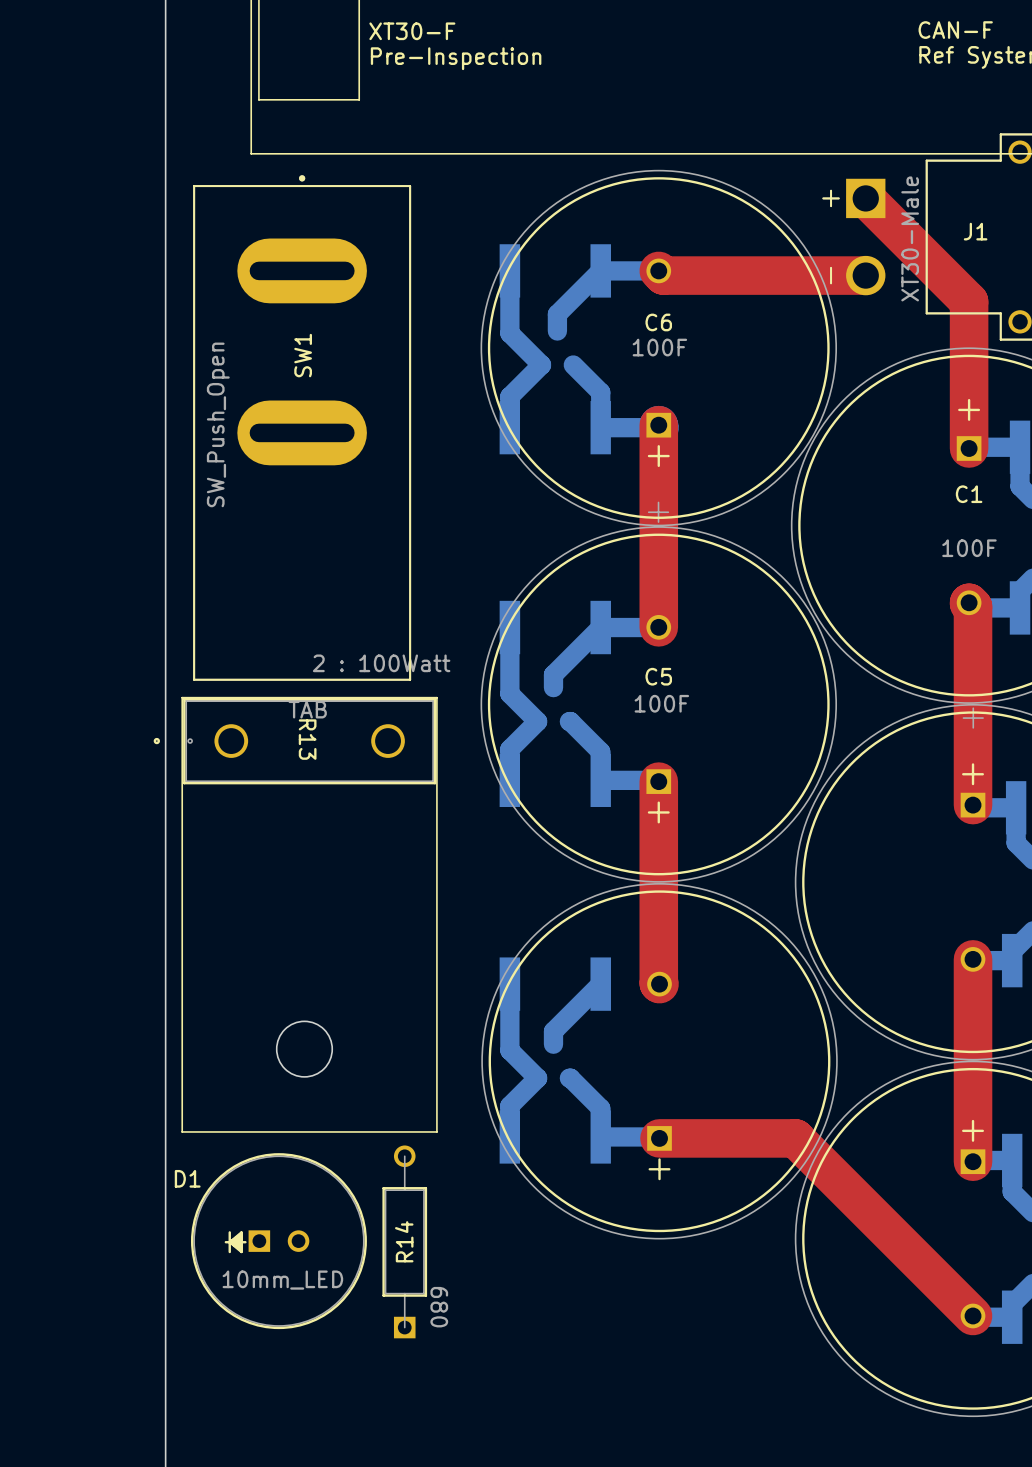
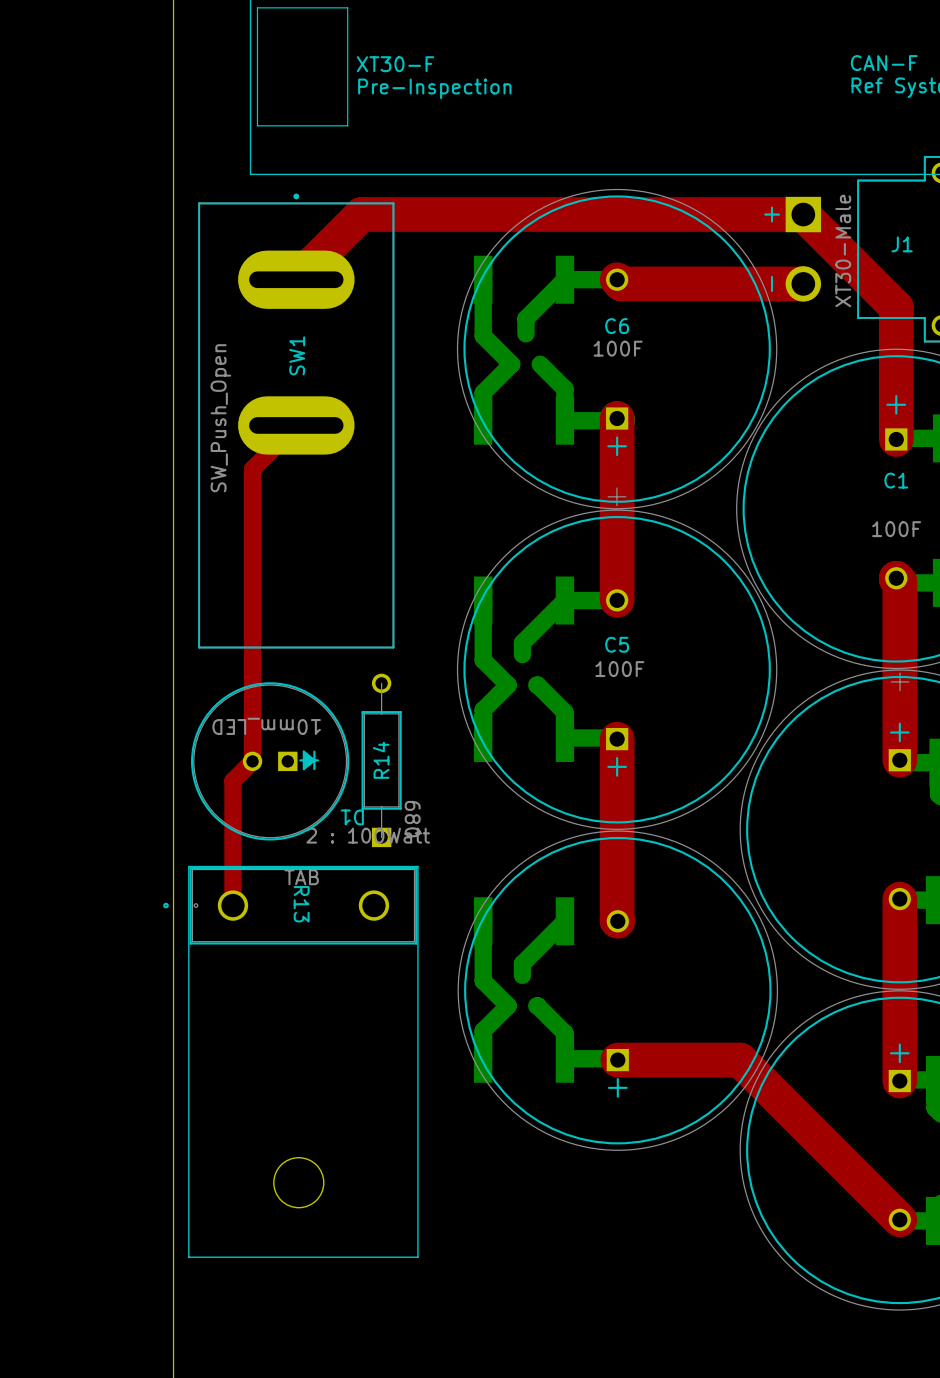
top track: none -> (803, 214) (361, 214) (296, 279)
top track: none -> (296, 425) (252, 469) (252, 761) (232, 780) (232, 905)
line: (182, 697) (436, 697) (436, 1131) (182, 1131) (182, 697) -> (188, 866) (417, 866) (417, 1257) (188, 1257) (188, 866)
R13 position: (294, 741) -> (290, 905)
round board edge position: (304, 1049) -> (298, 1182)
D1 rotation: 0° (278, 1241) -> 180° (270, 761)
D1 position: (278, 1241) -> (270, 761)
R14 position: (404, 1241) -> (381, 760)

